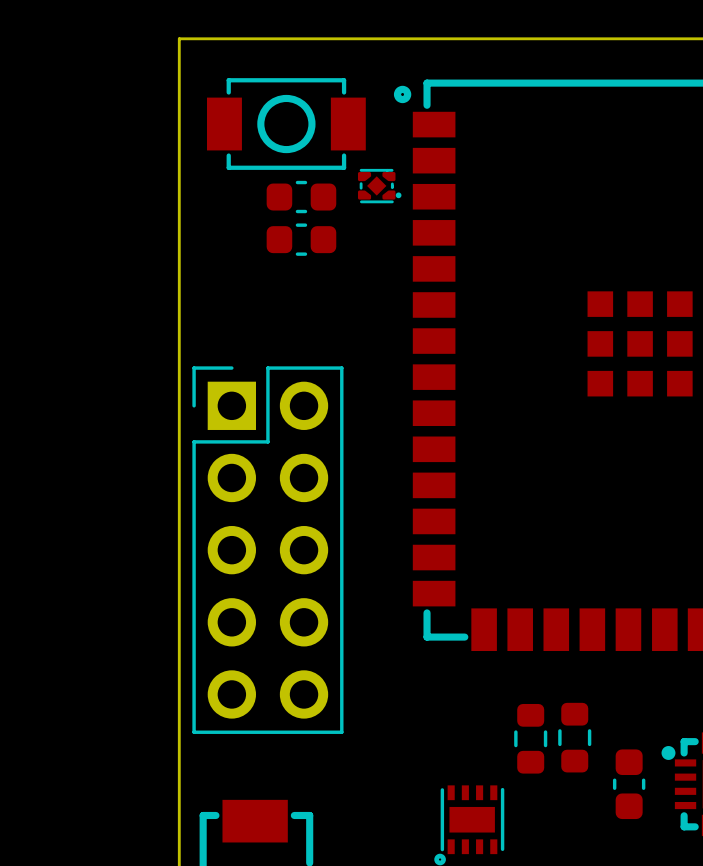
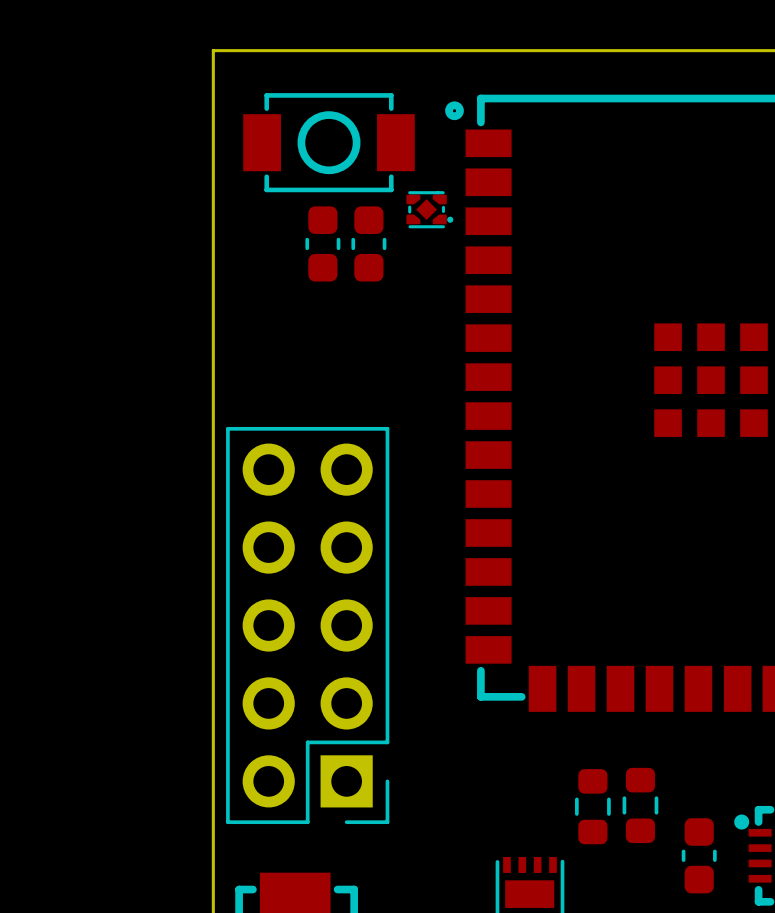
part: (301, 197) -> none
part: none -> (322, 243)
part: none -> (368, 243)
part: (301, 239) -> none
part rotation: 0° (267, 550) -> 180° (307, 625)

